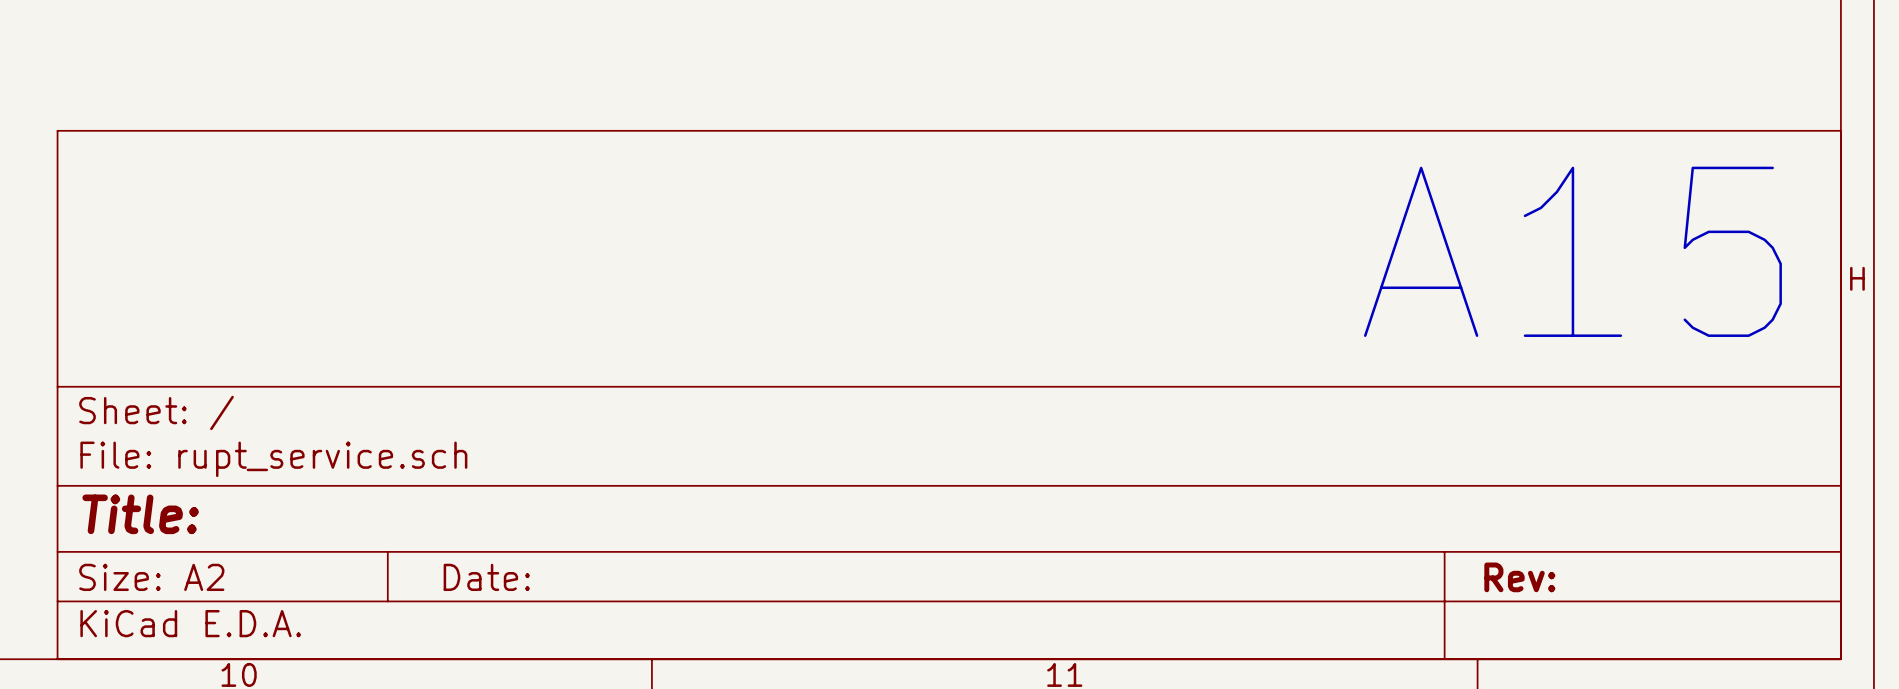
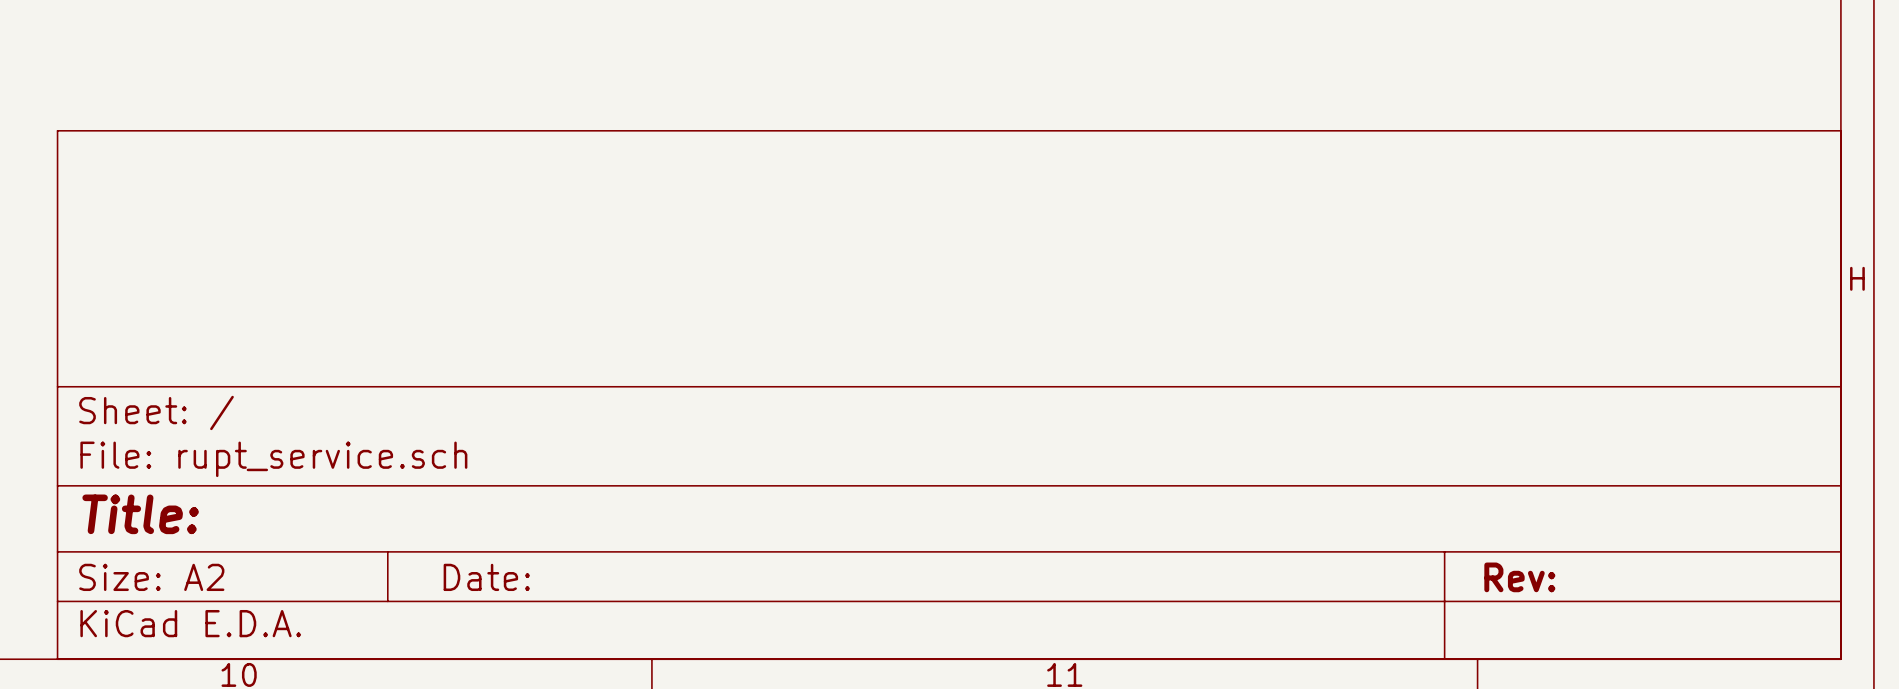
text: A15 (1572, 251) -> none

